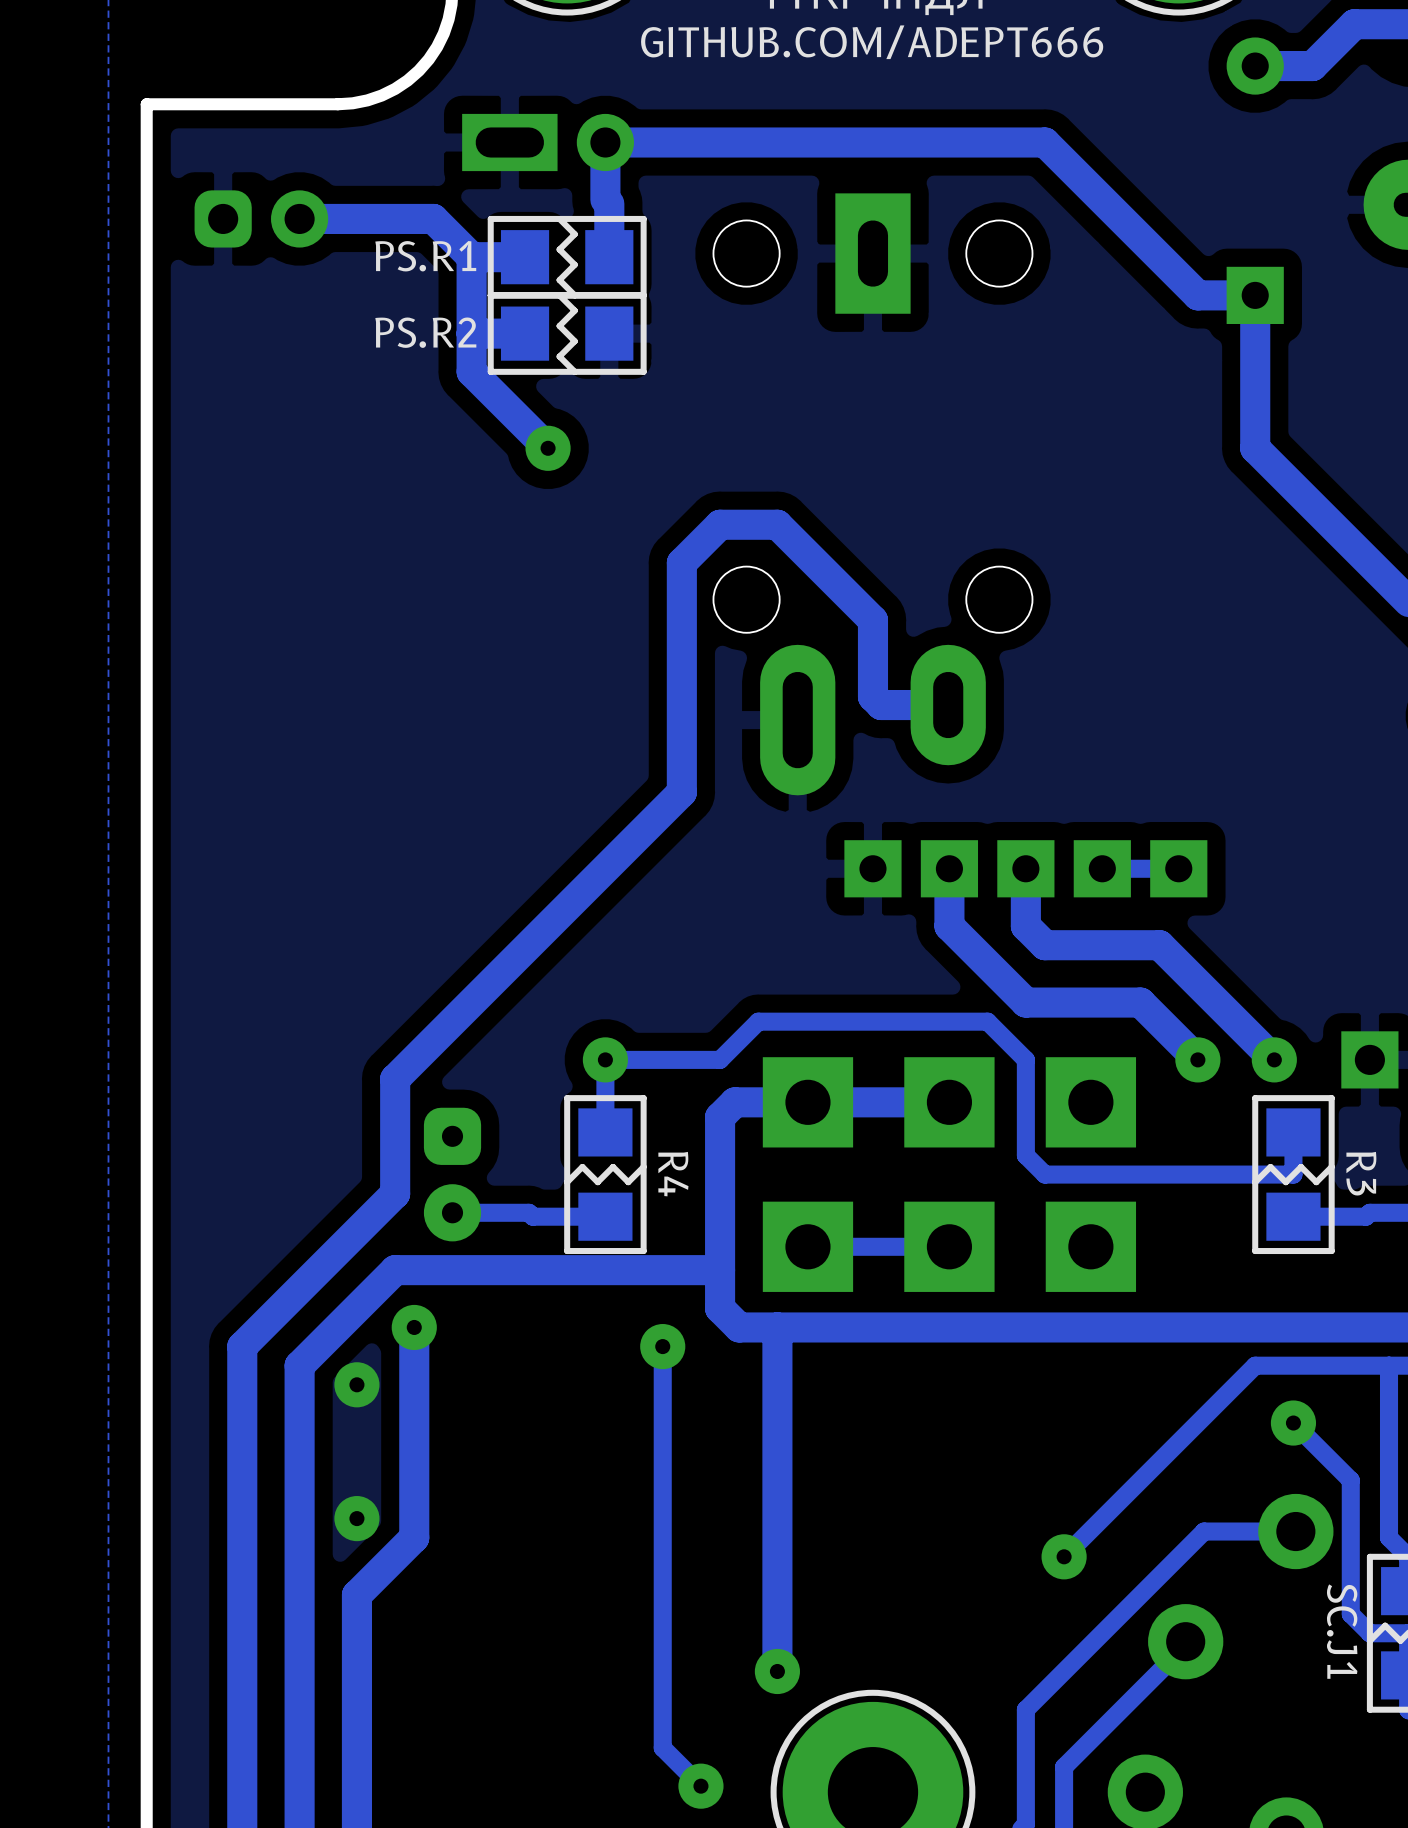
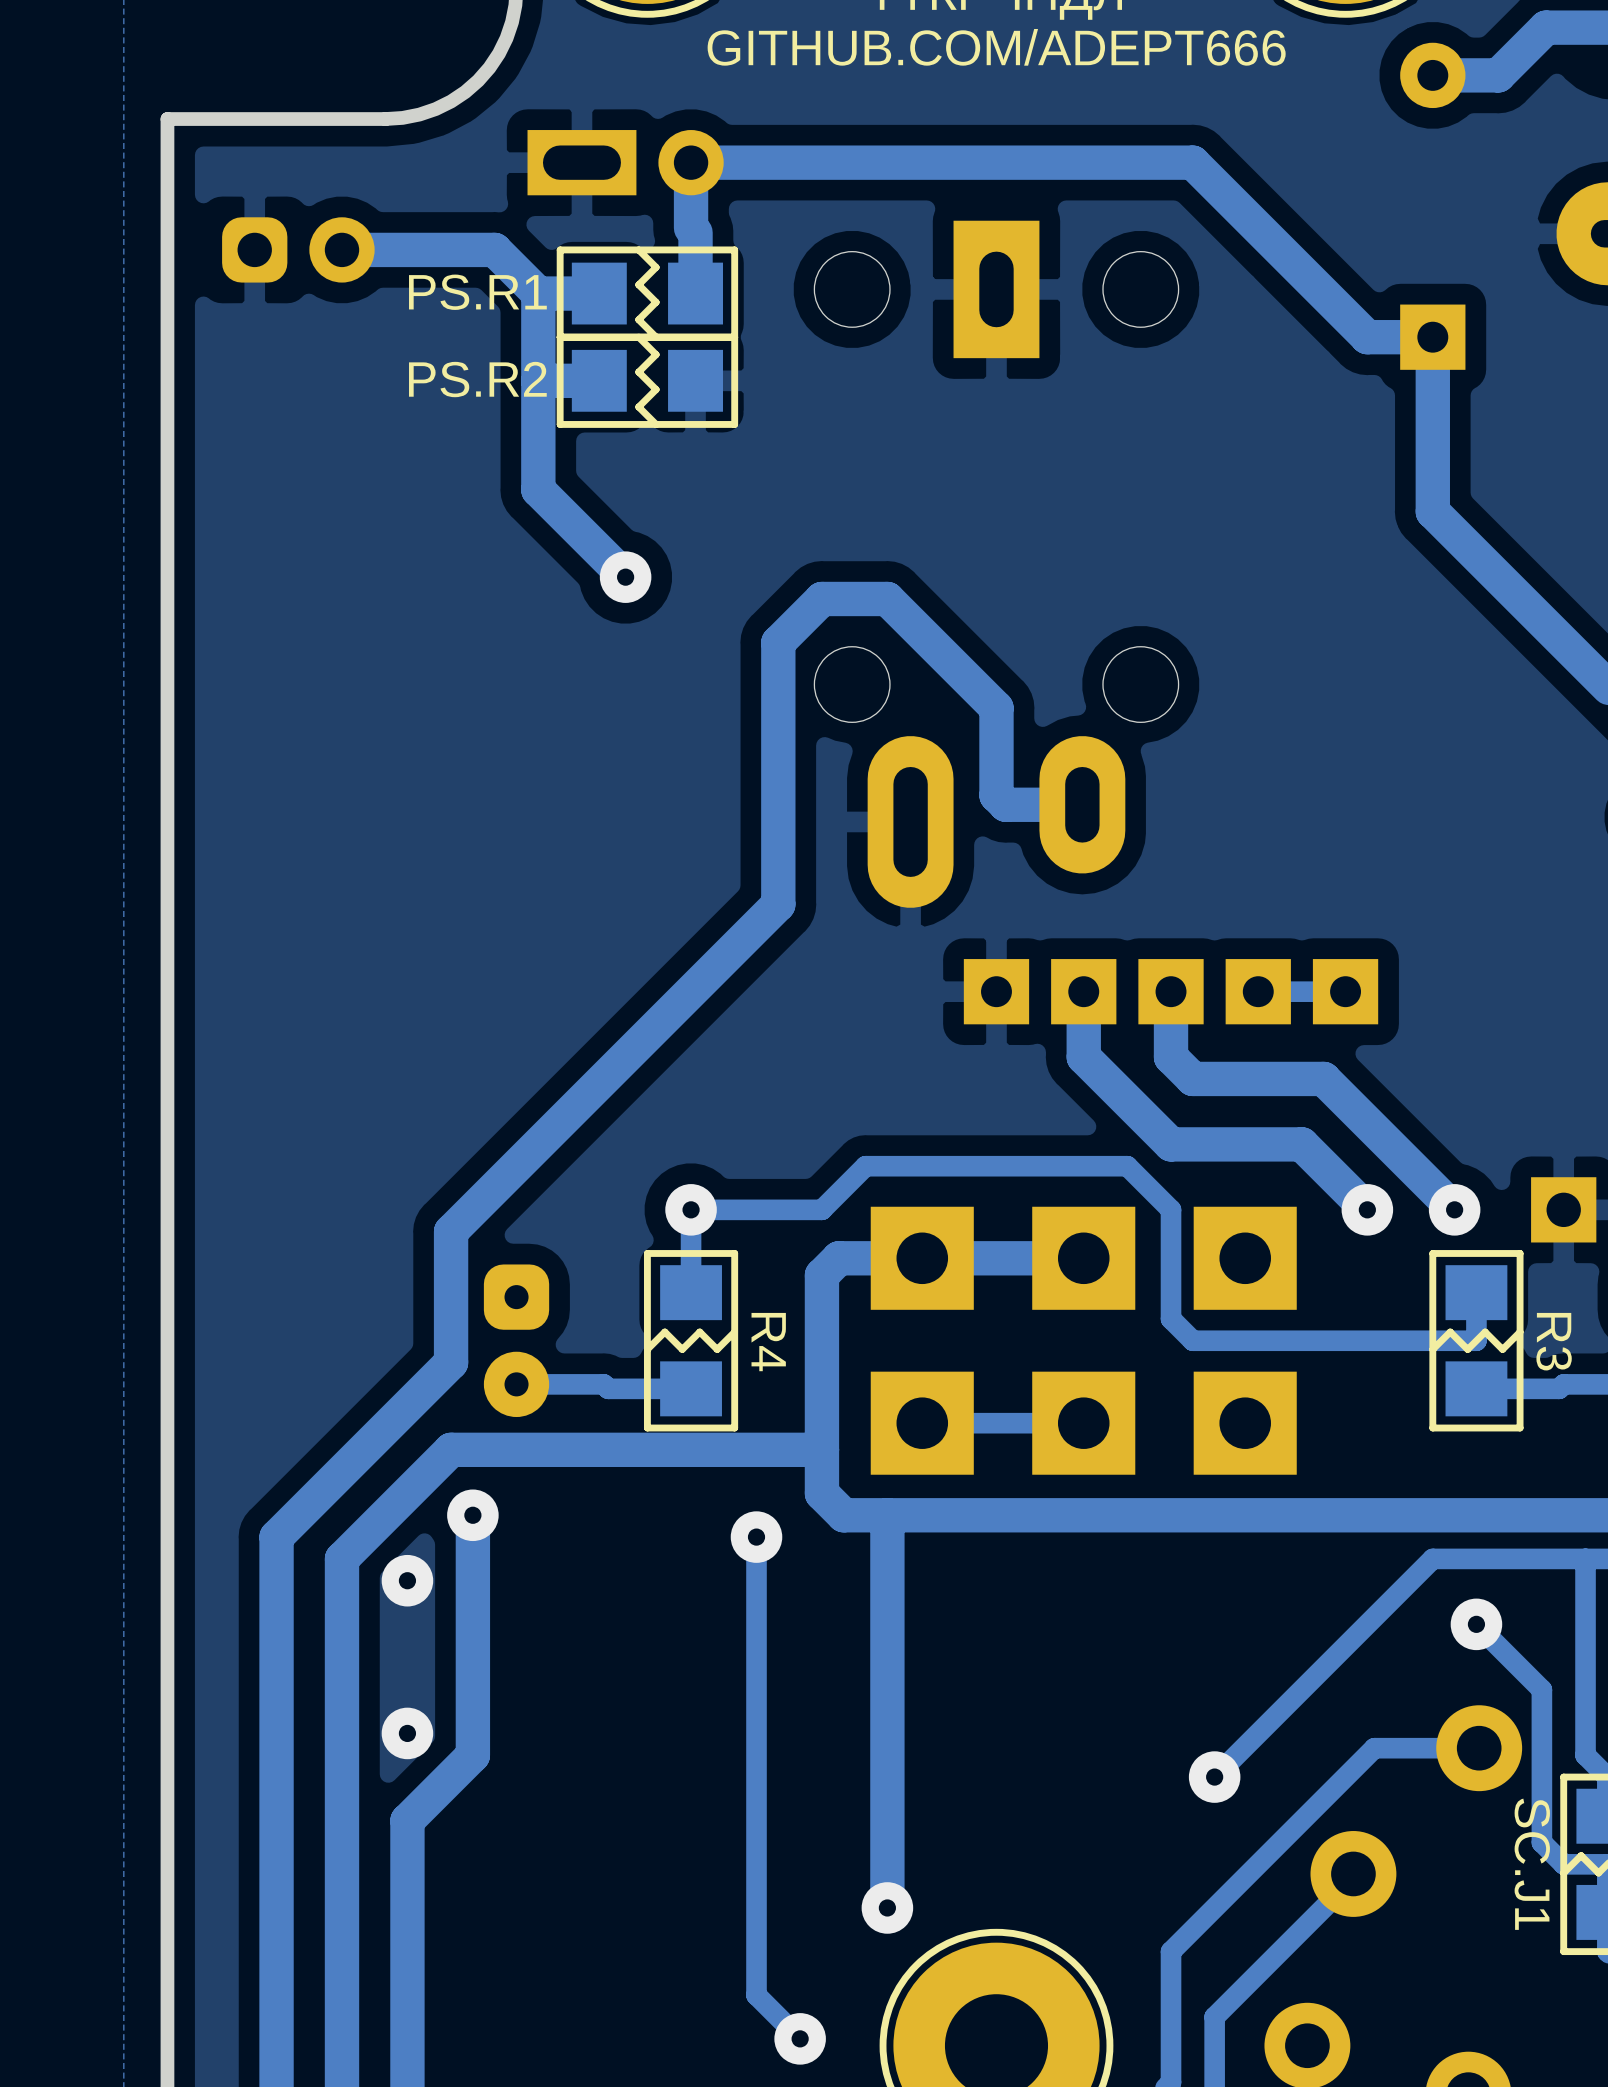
track: (471, 371) (548, 448) -> (538, 424) (538, 489) (625, 577)
via position: (548, 448) -> (625, 577)

